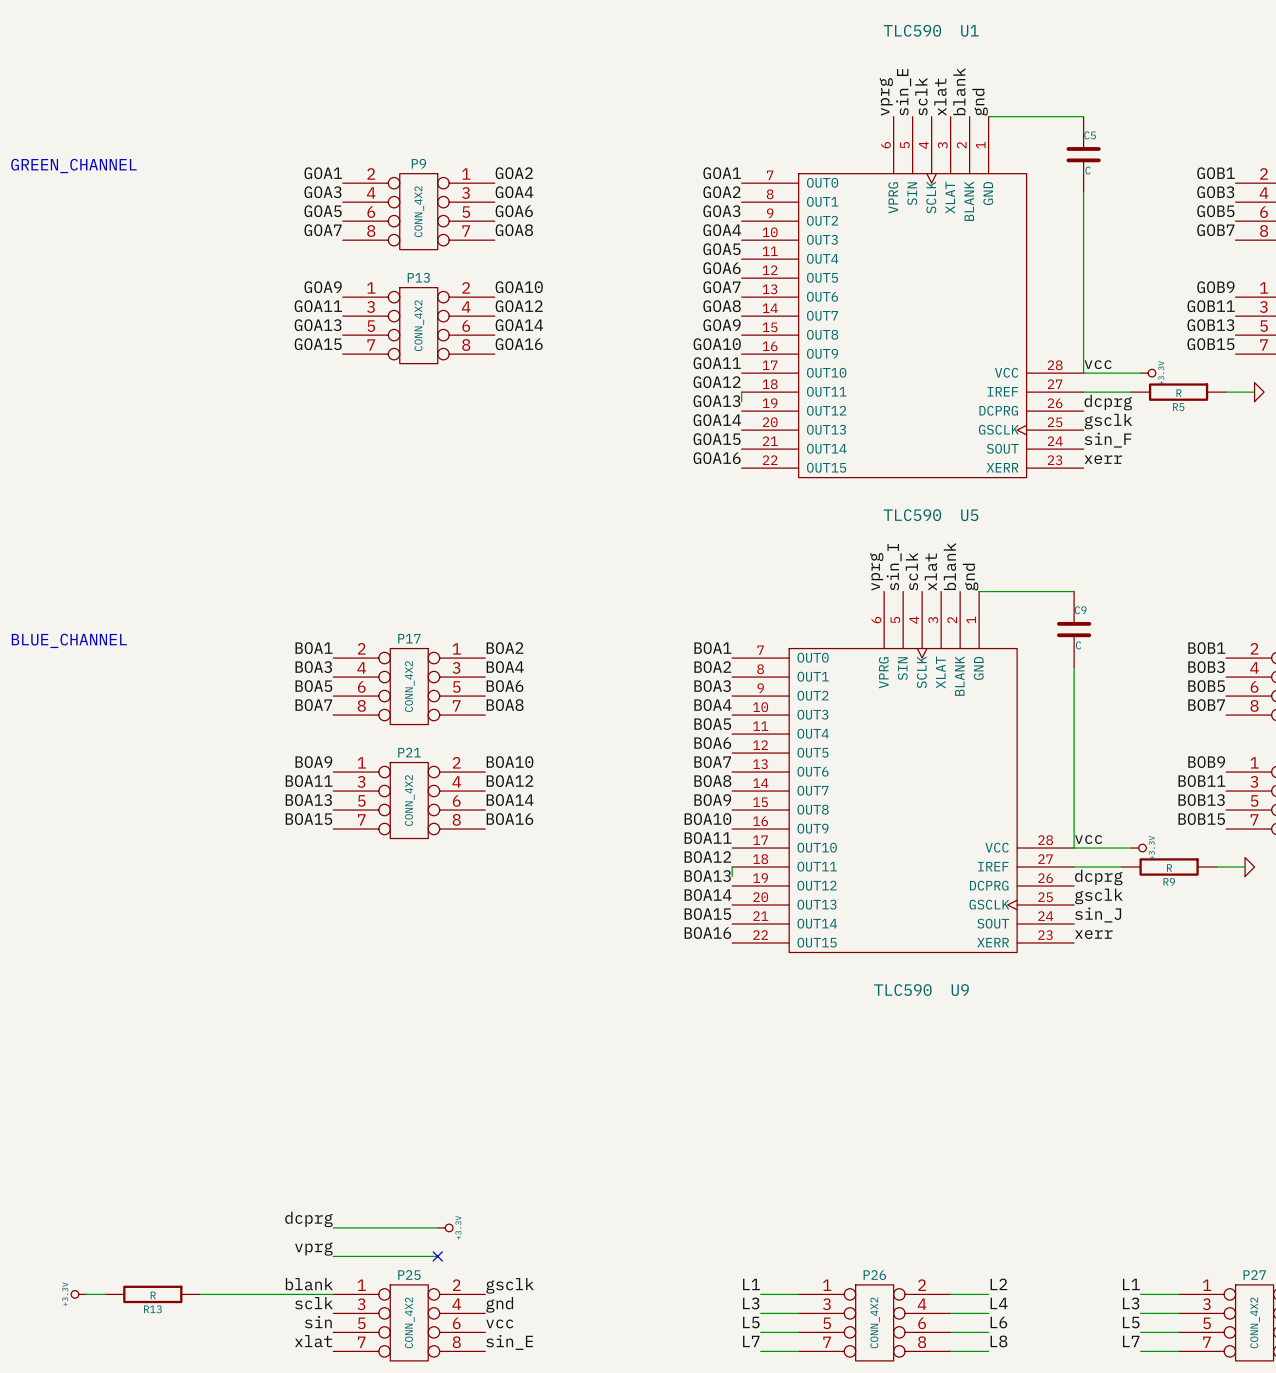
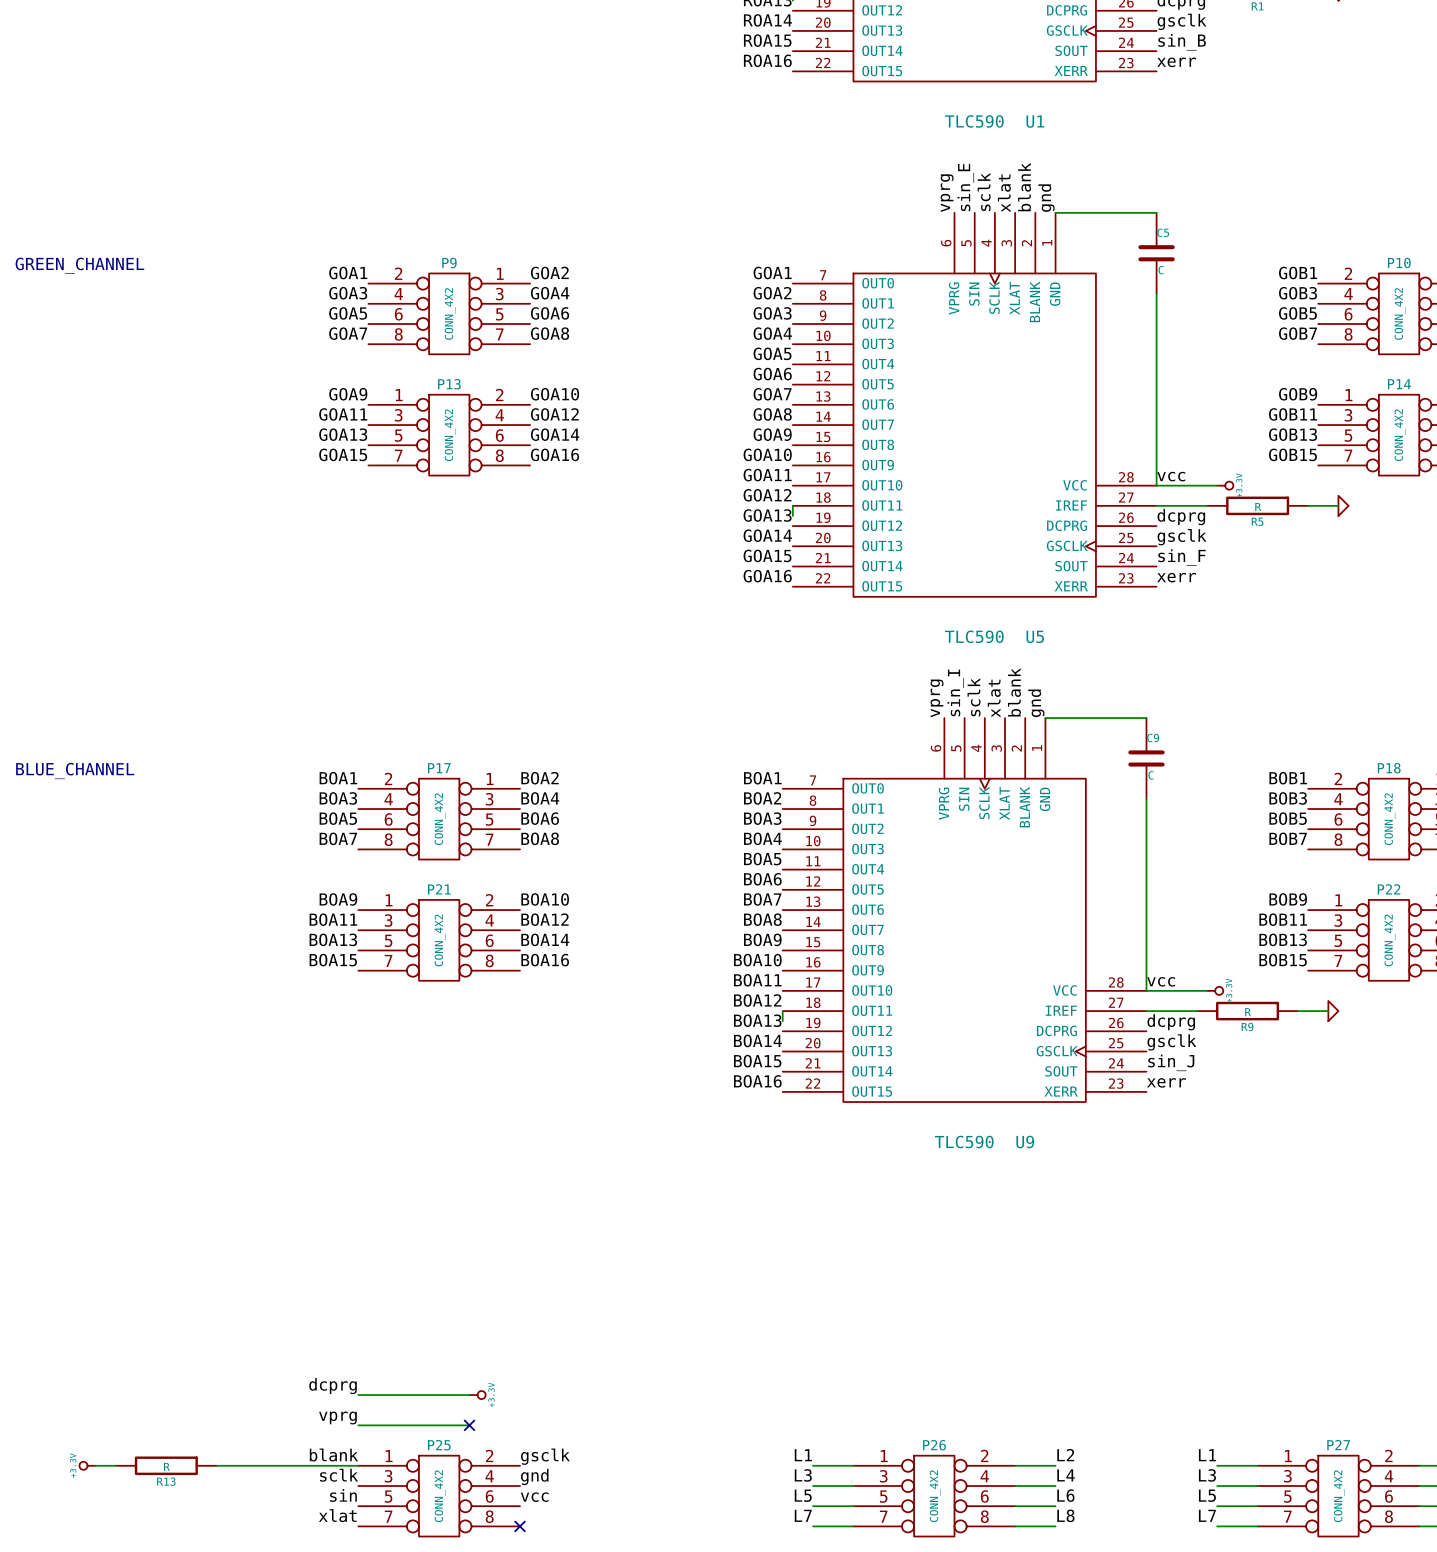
label: sin_E (509, 1342) -> none
no-connect mark: none -> (520, 1526)

